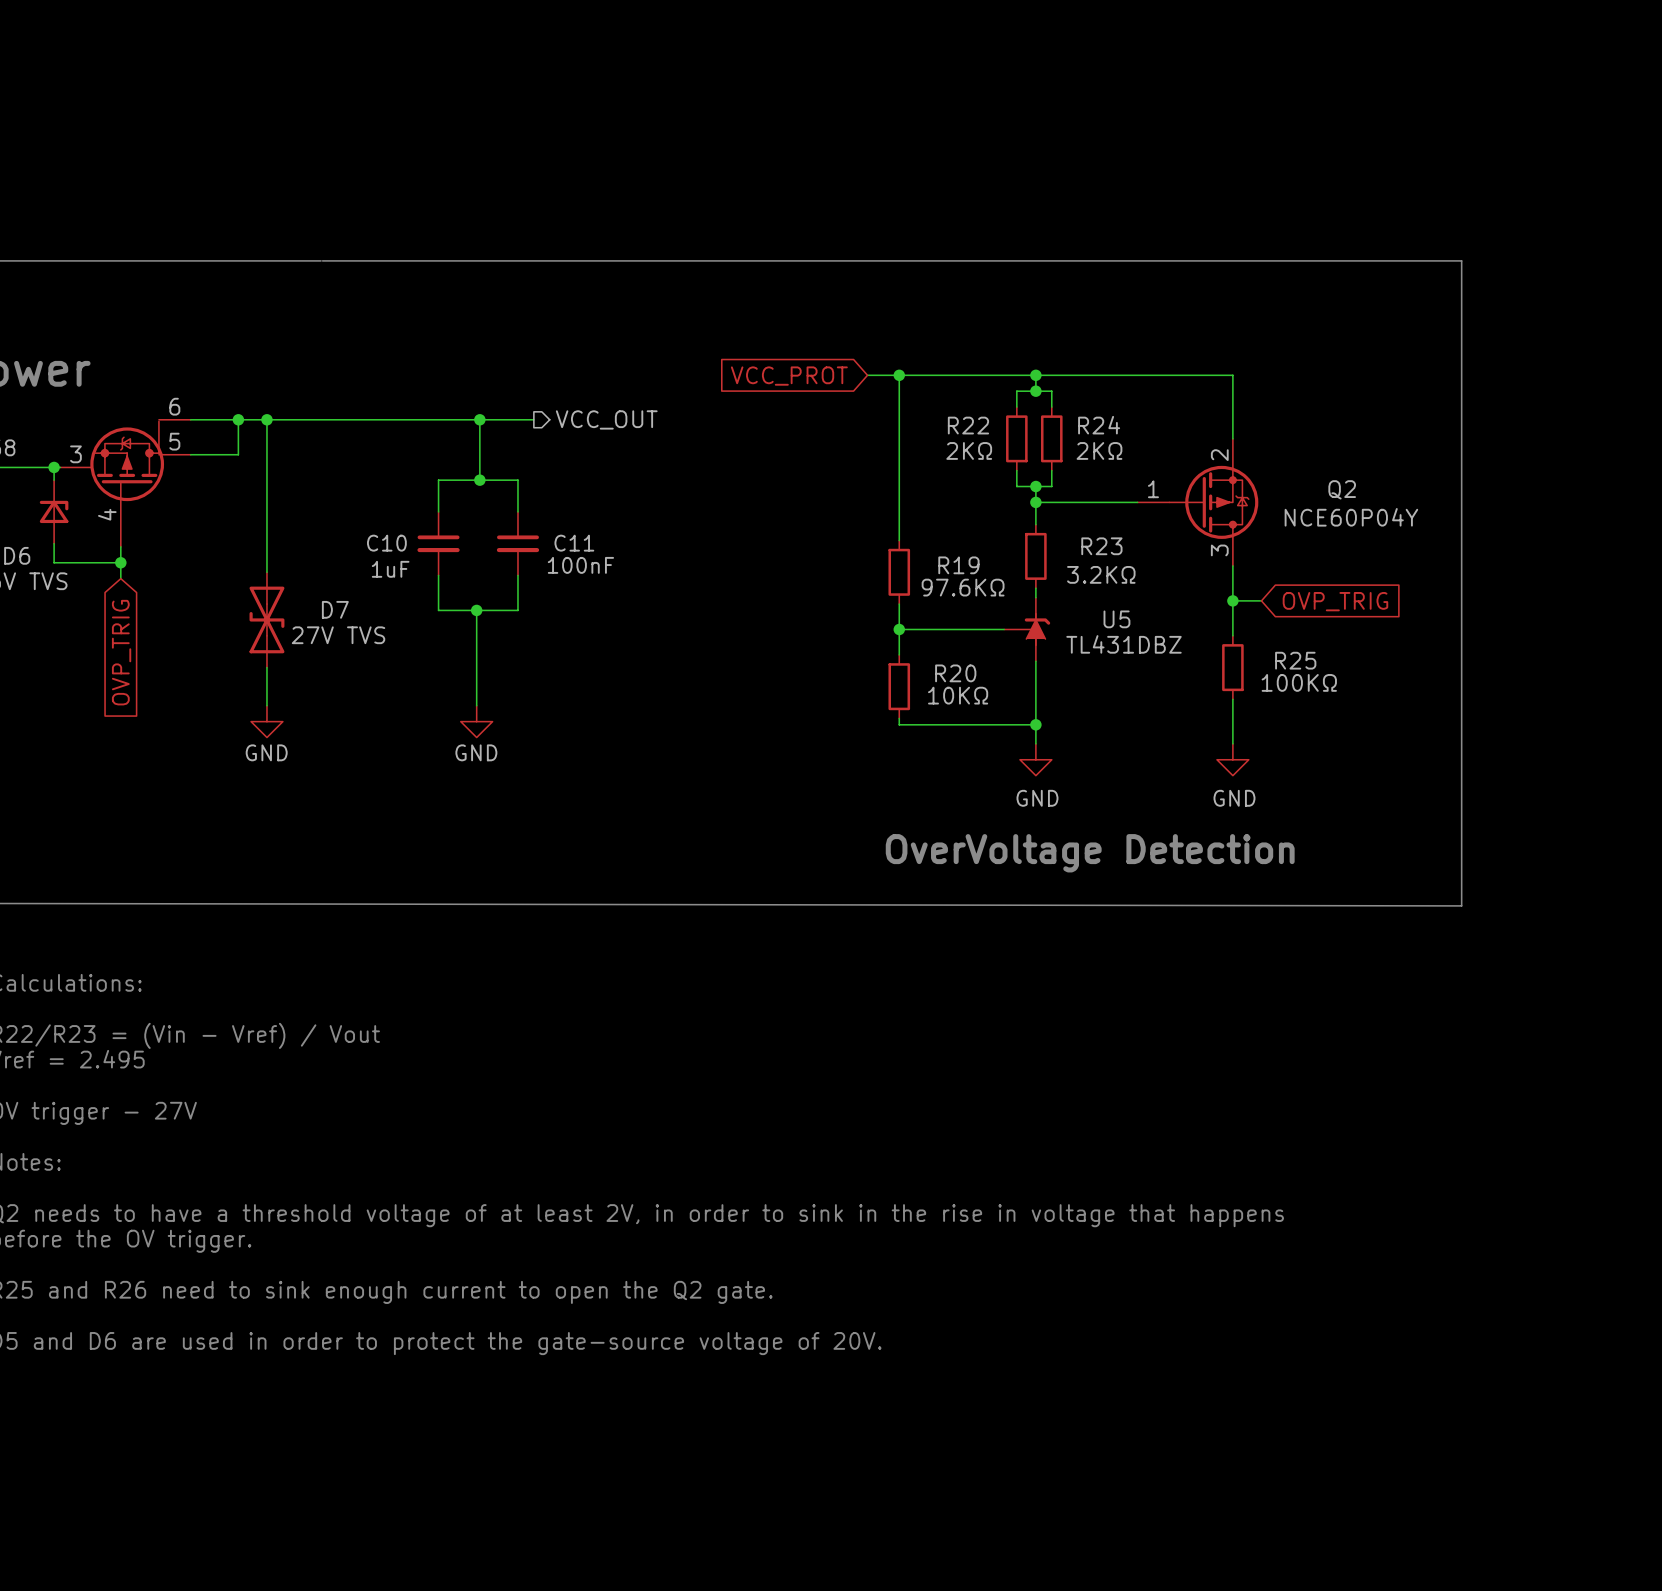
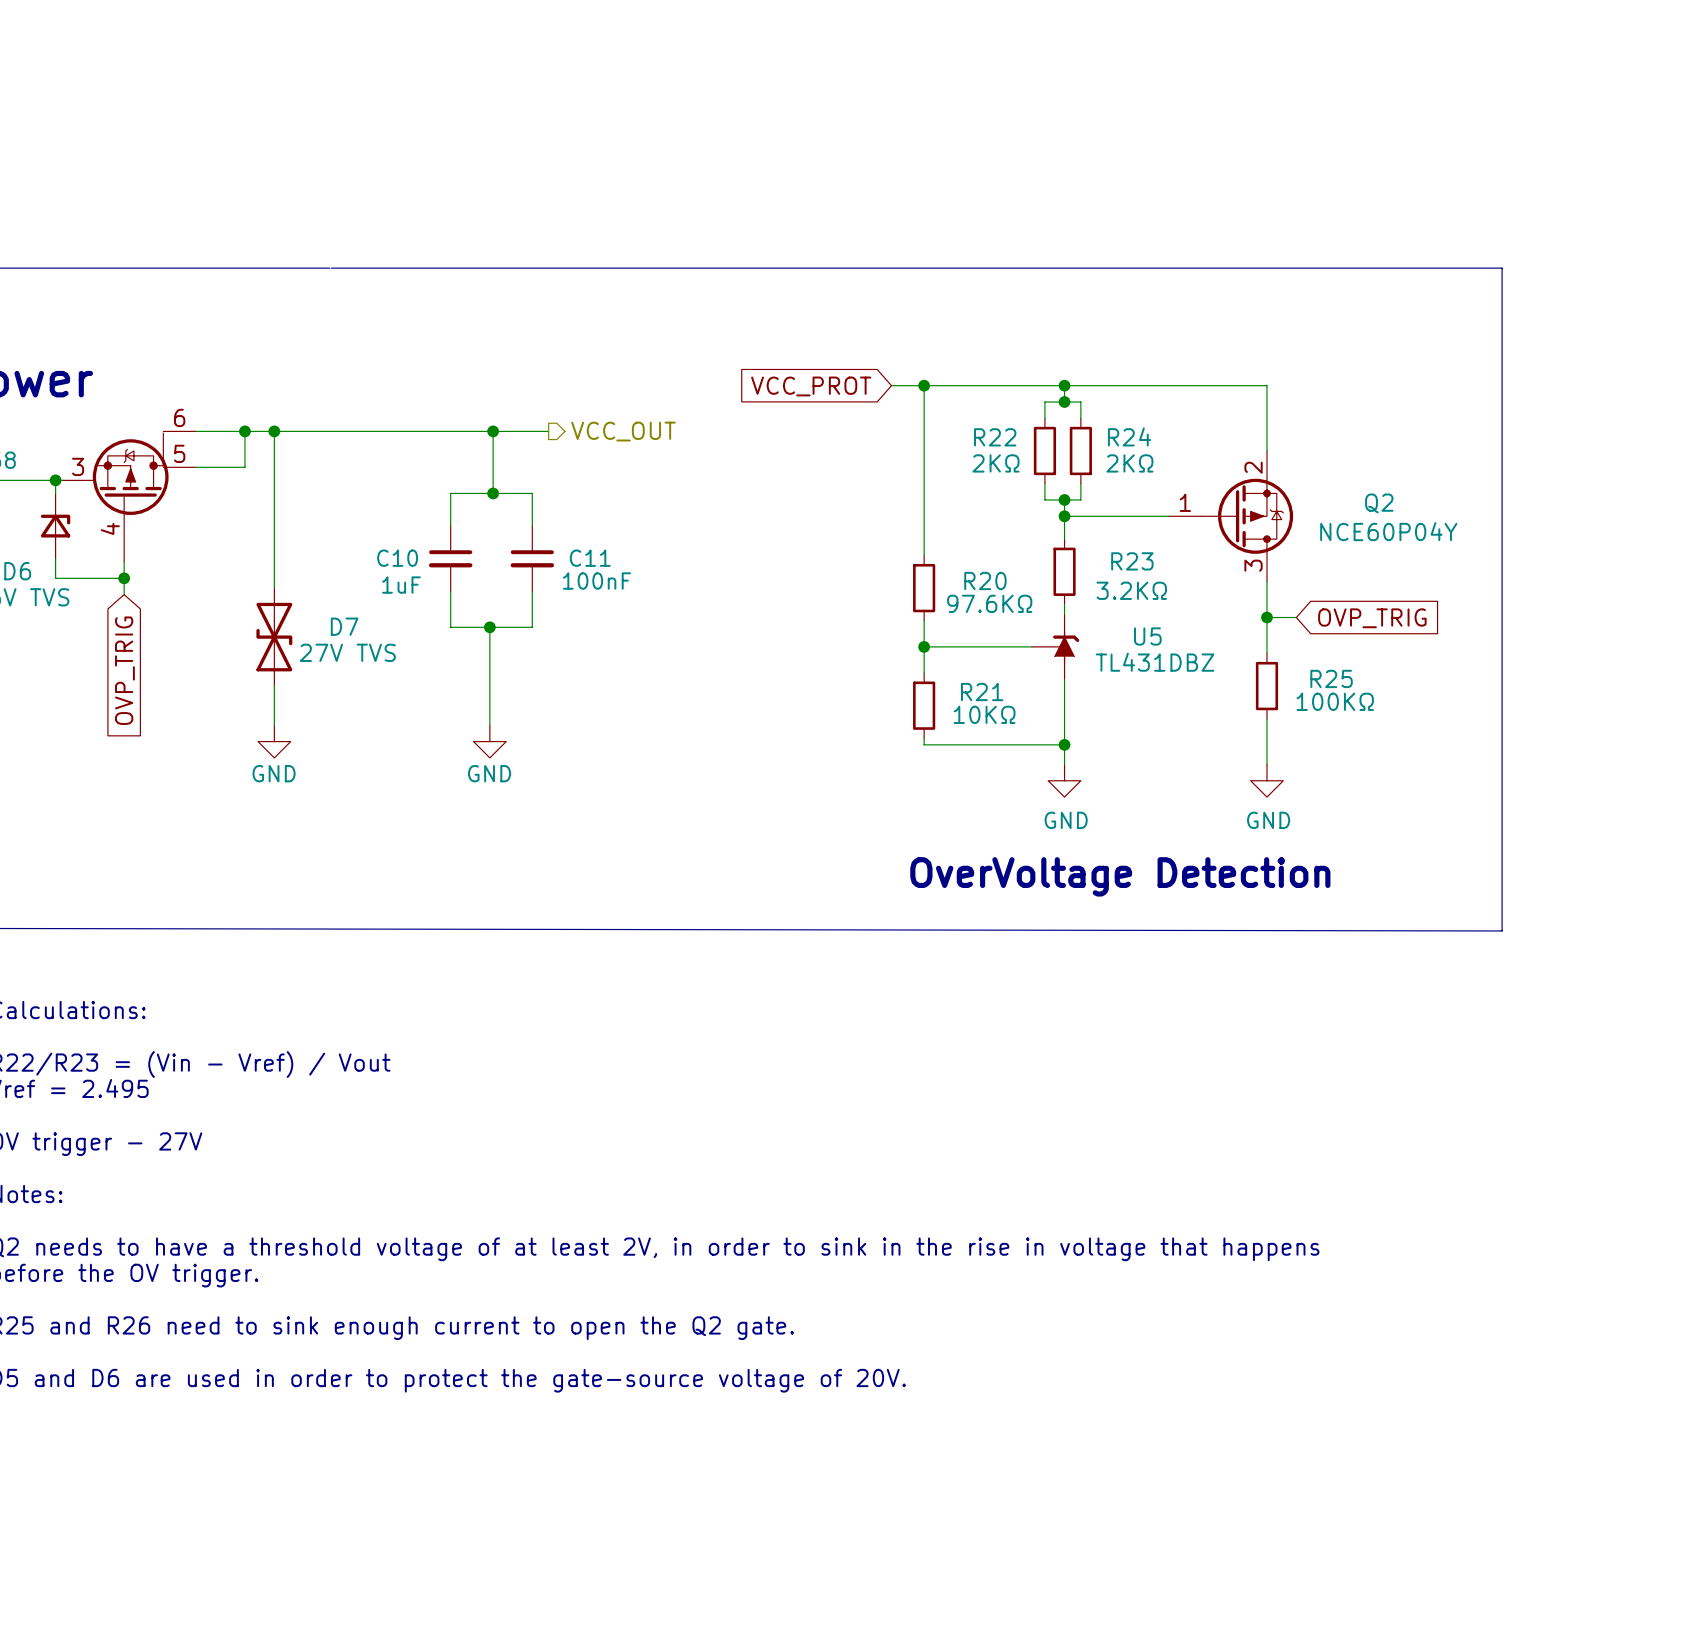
R19 name: R19 (958, 565) -> R20 (985, 580)
R20 name: R20 (955, 673) -> R21 (982, 692)

